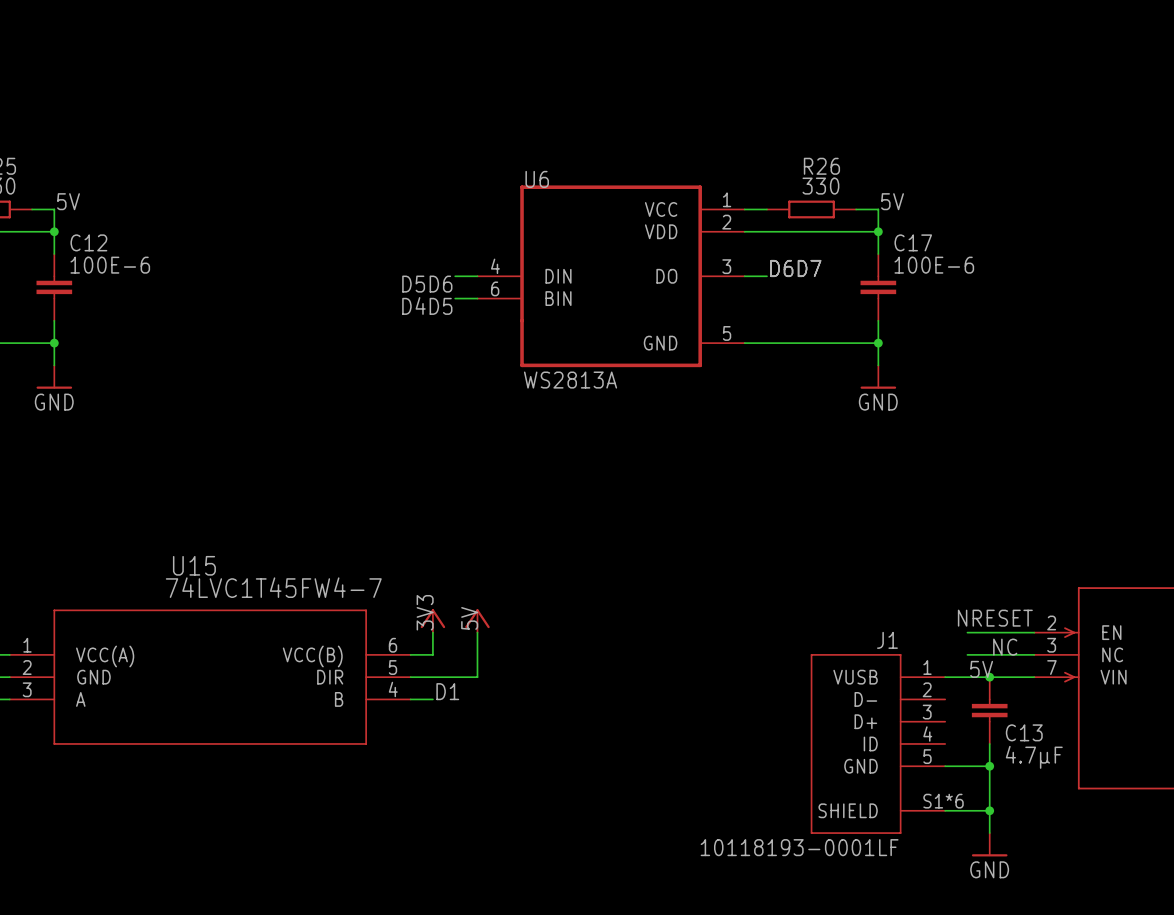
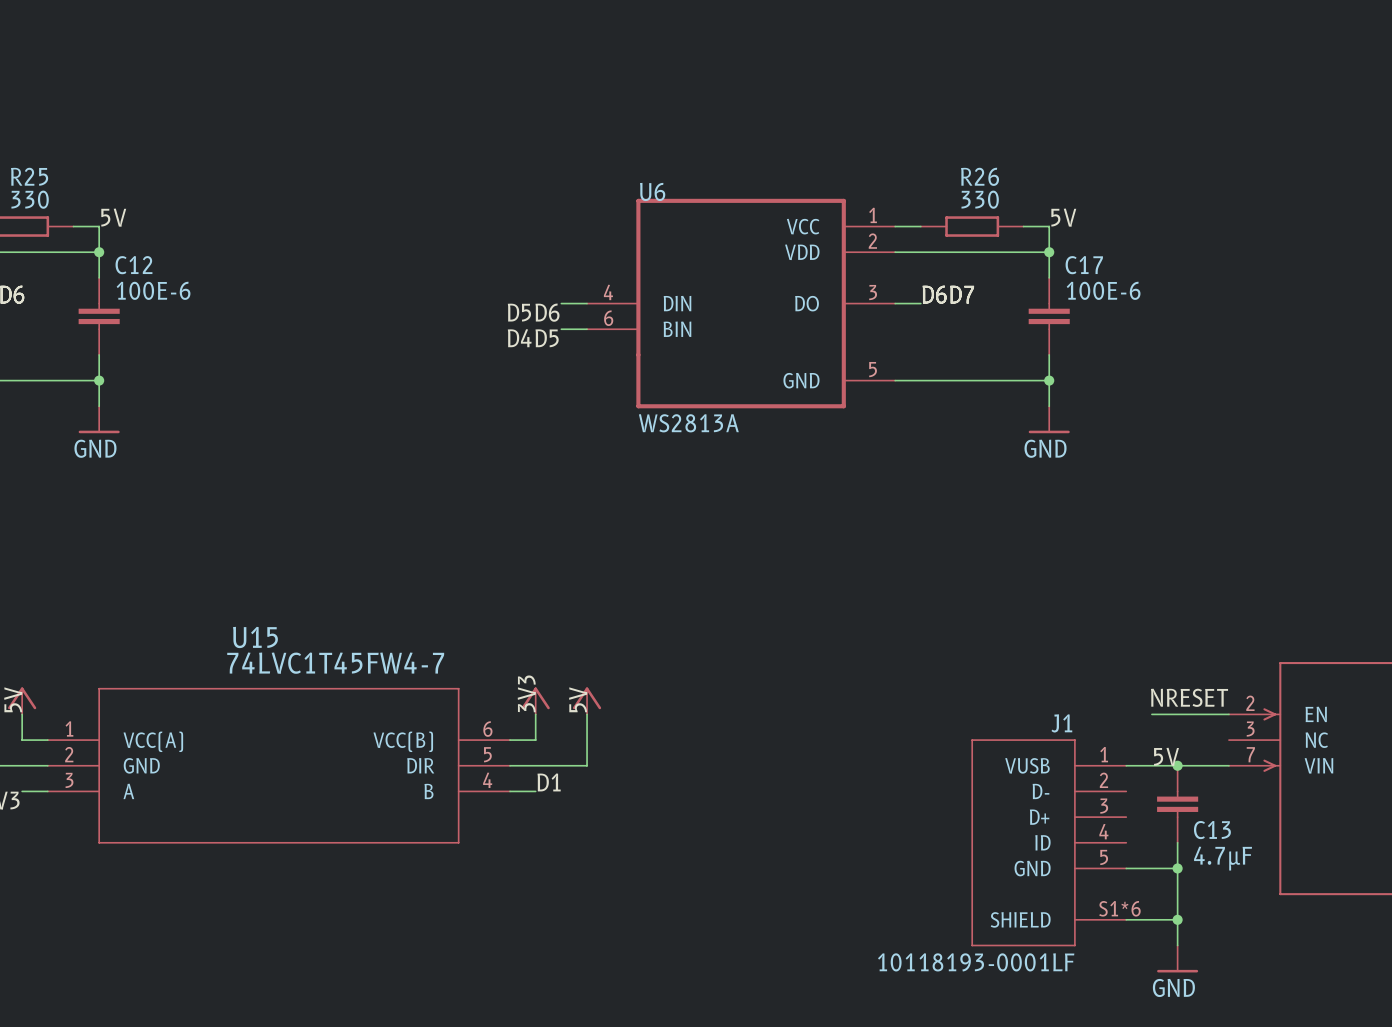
label: NC (1005, 647) -> none
wire: (967, 654) (1034, 654) -> none

